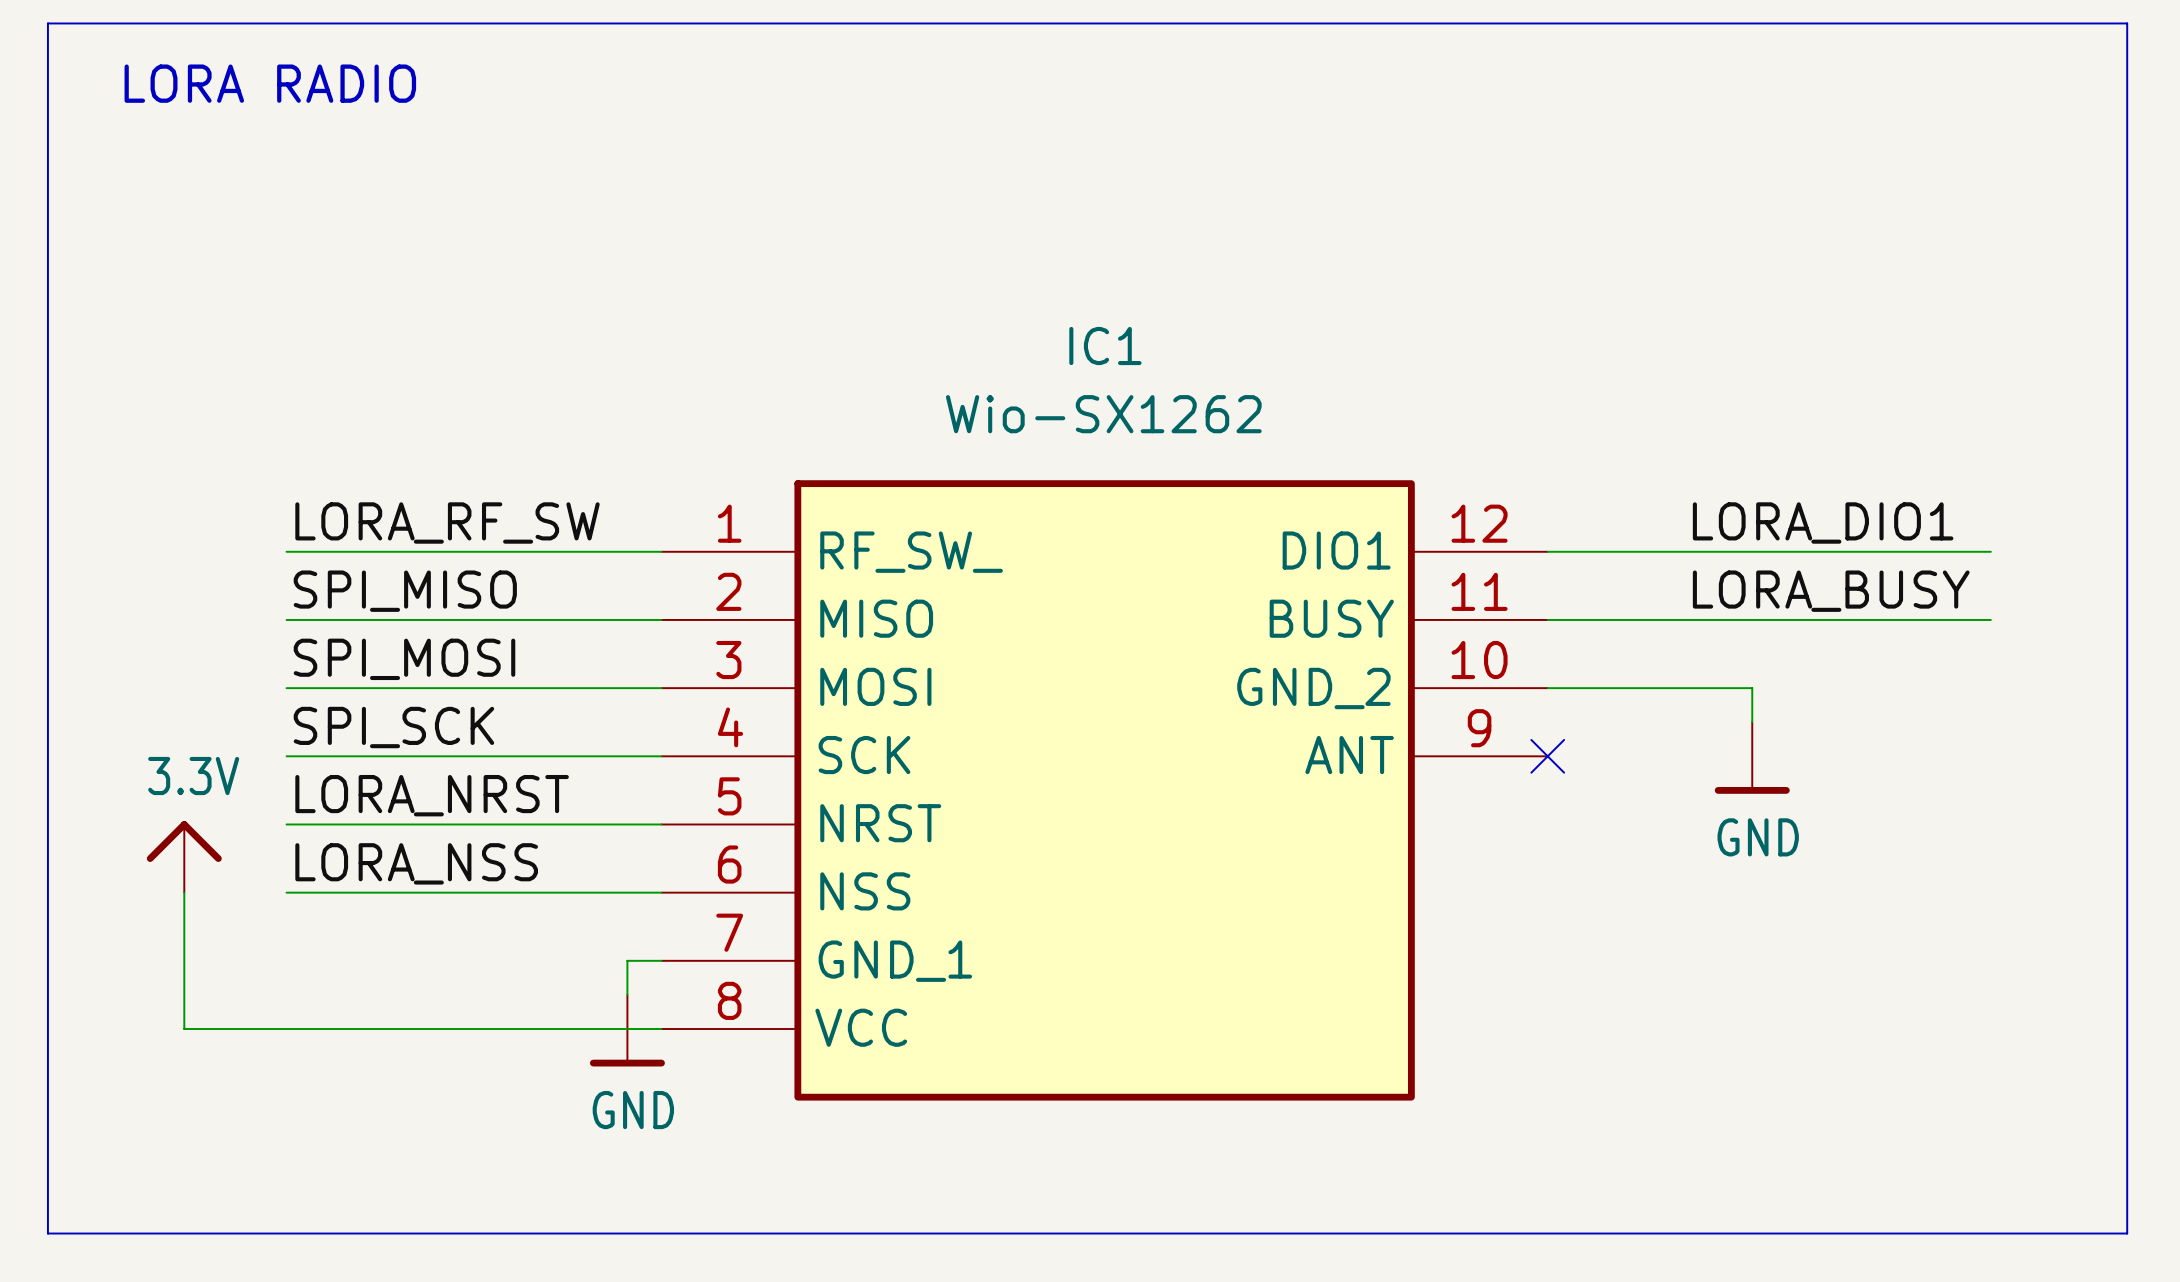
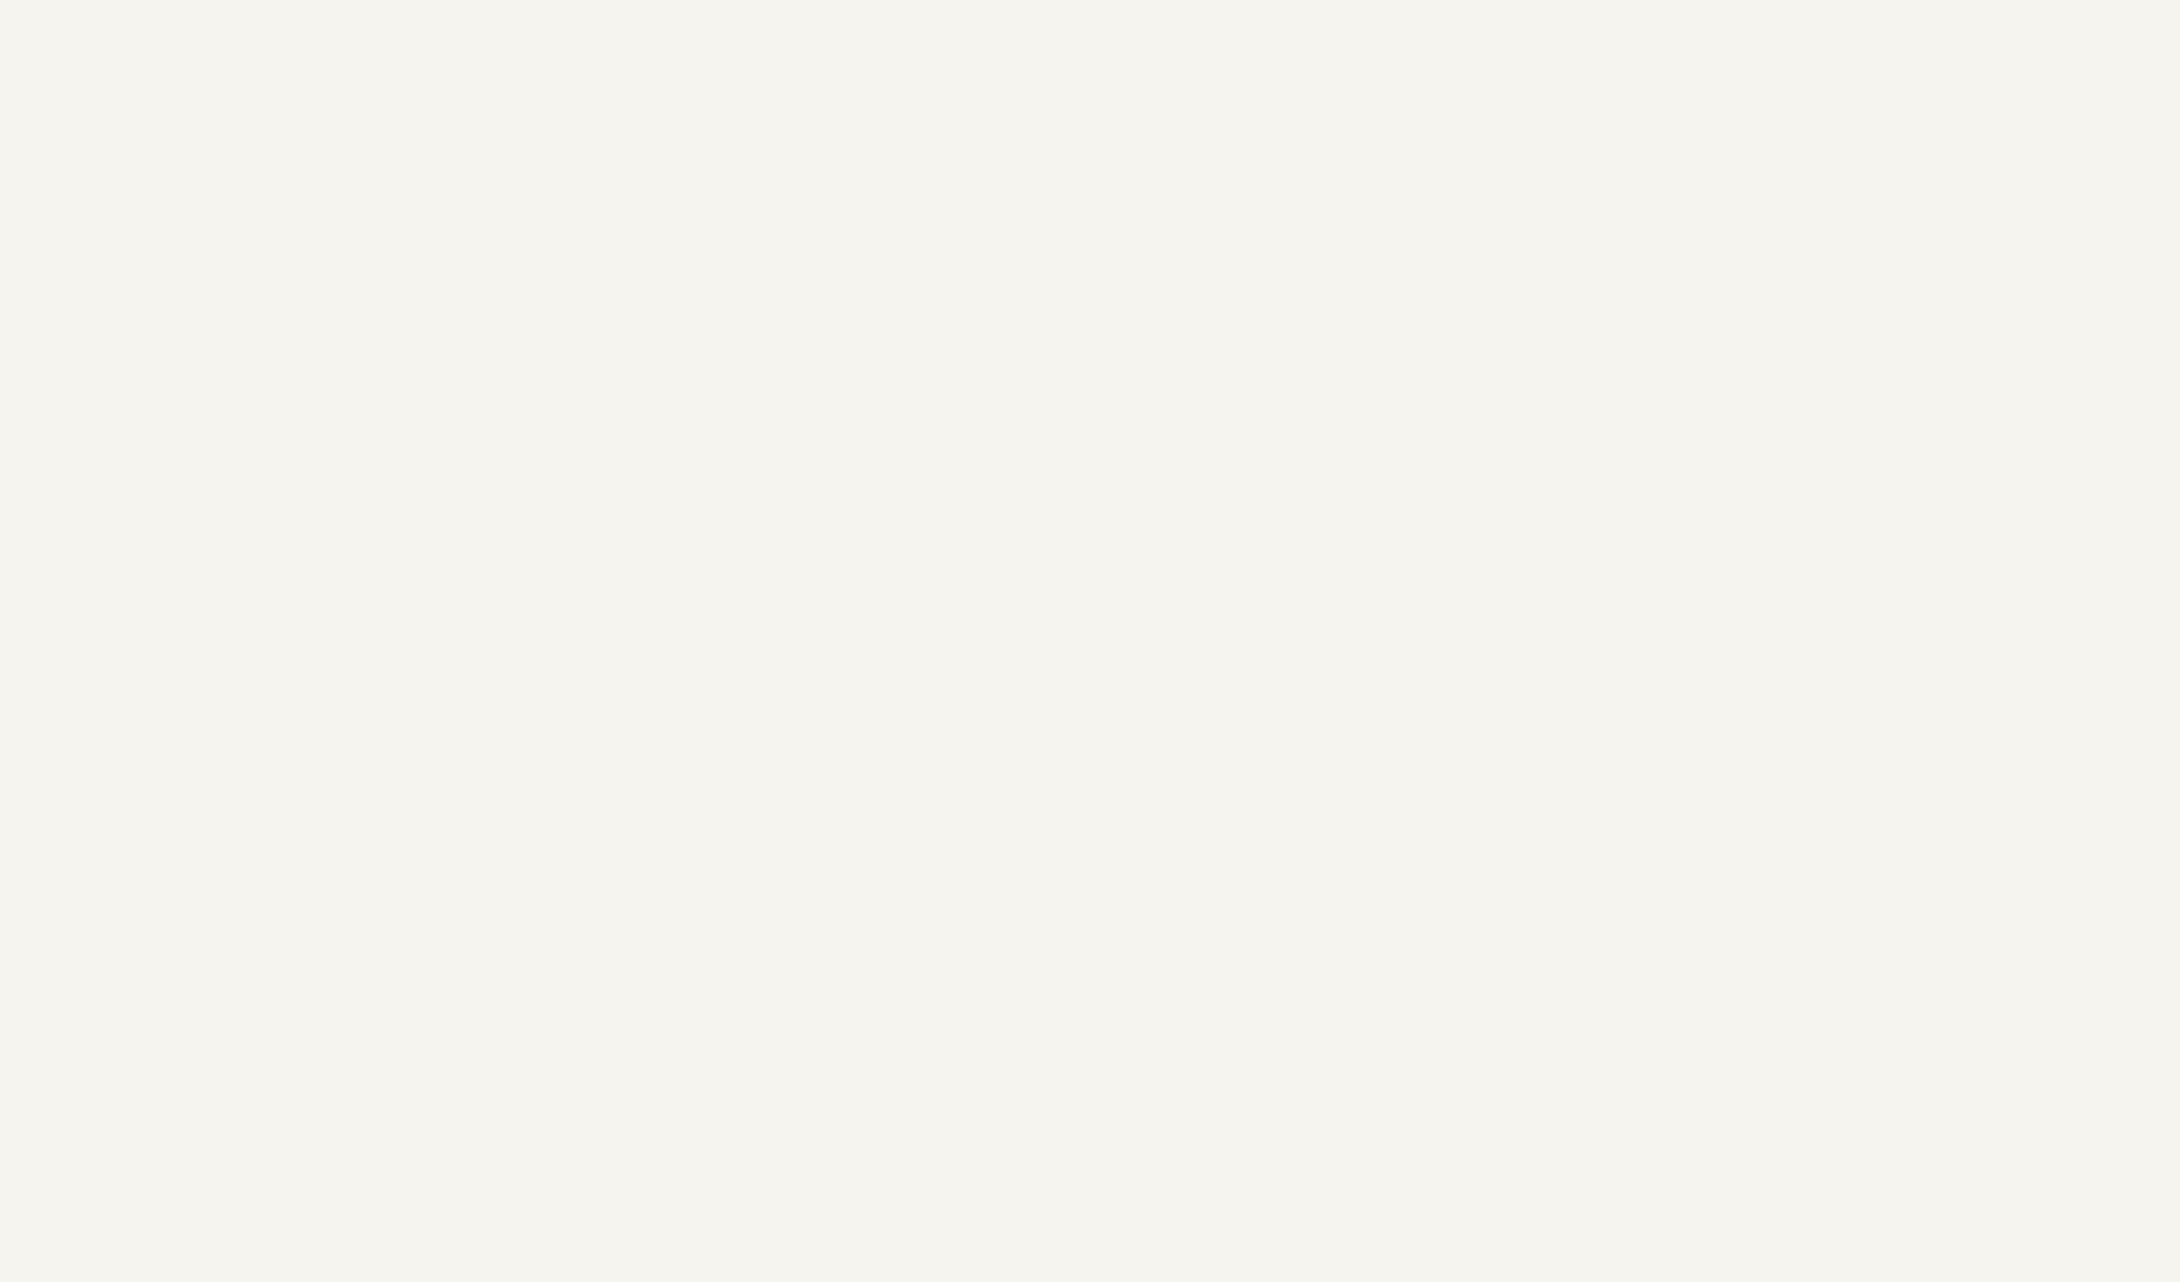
line: (47, 23) (2127, 23) (2127, 1233) (47, 1233) (47, 23) -> none
text: LORA RADIO (270, 83) -> none
label: LORA_RF_SW (447, 523) -> none
label: LORA_DIO1 (1823, 523) -> none
wire: (286, 551) (661, 551) -> none
wire: (1547, 551) (1990, 551) -> none
label: SPI_MISO (405, 591) -> none
label: LORA_BUSY (1831, 591) -> none
wire: (286, 619) (661, 619) -> none
wire: (1547, 619) (1990, 619) -> none
label: SPI_MOSI (404, 659) -> none
wire: (286, 688) (661, 688) -> none
wire: (1547, 688) (1752, 688) (1752, 722) -> none
label: SPI_SCK (393, 727) -> none
wire: (286, 756) (661, 756) -> none
no-connect mark: (1547, 756) -> none
power symbol: GND (1752, 758) -> none
IC1: Wio-SX1262 (1104, 790) -> none
label: LORA_NRST (432, 795) -> none
wire: (286, 824) (661, 824) -> none
power symbol: 3.3V (184, 856) -> none
label: LORA_NSS (416, 863) -> none
wire: (184, 892) (184, 1029) (661, 1029) -> none
wire: (286, 892) (661, 892) -> none
wire: (661, 960) (627, 960) (627, 994) -> none
power symbol: GND (627, 1030) -> none

